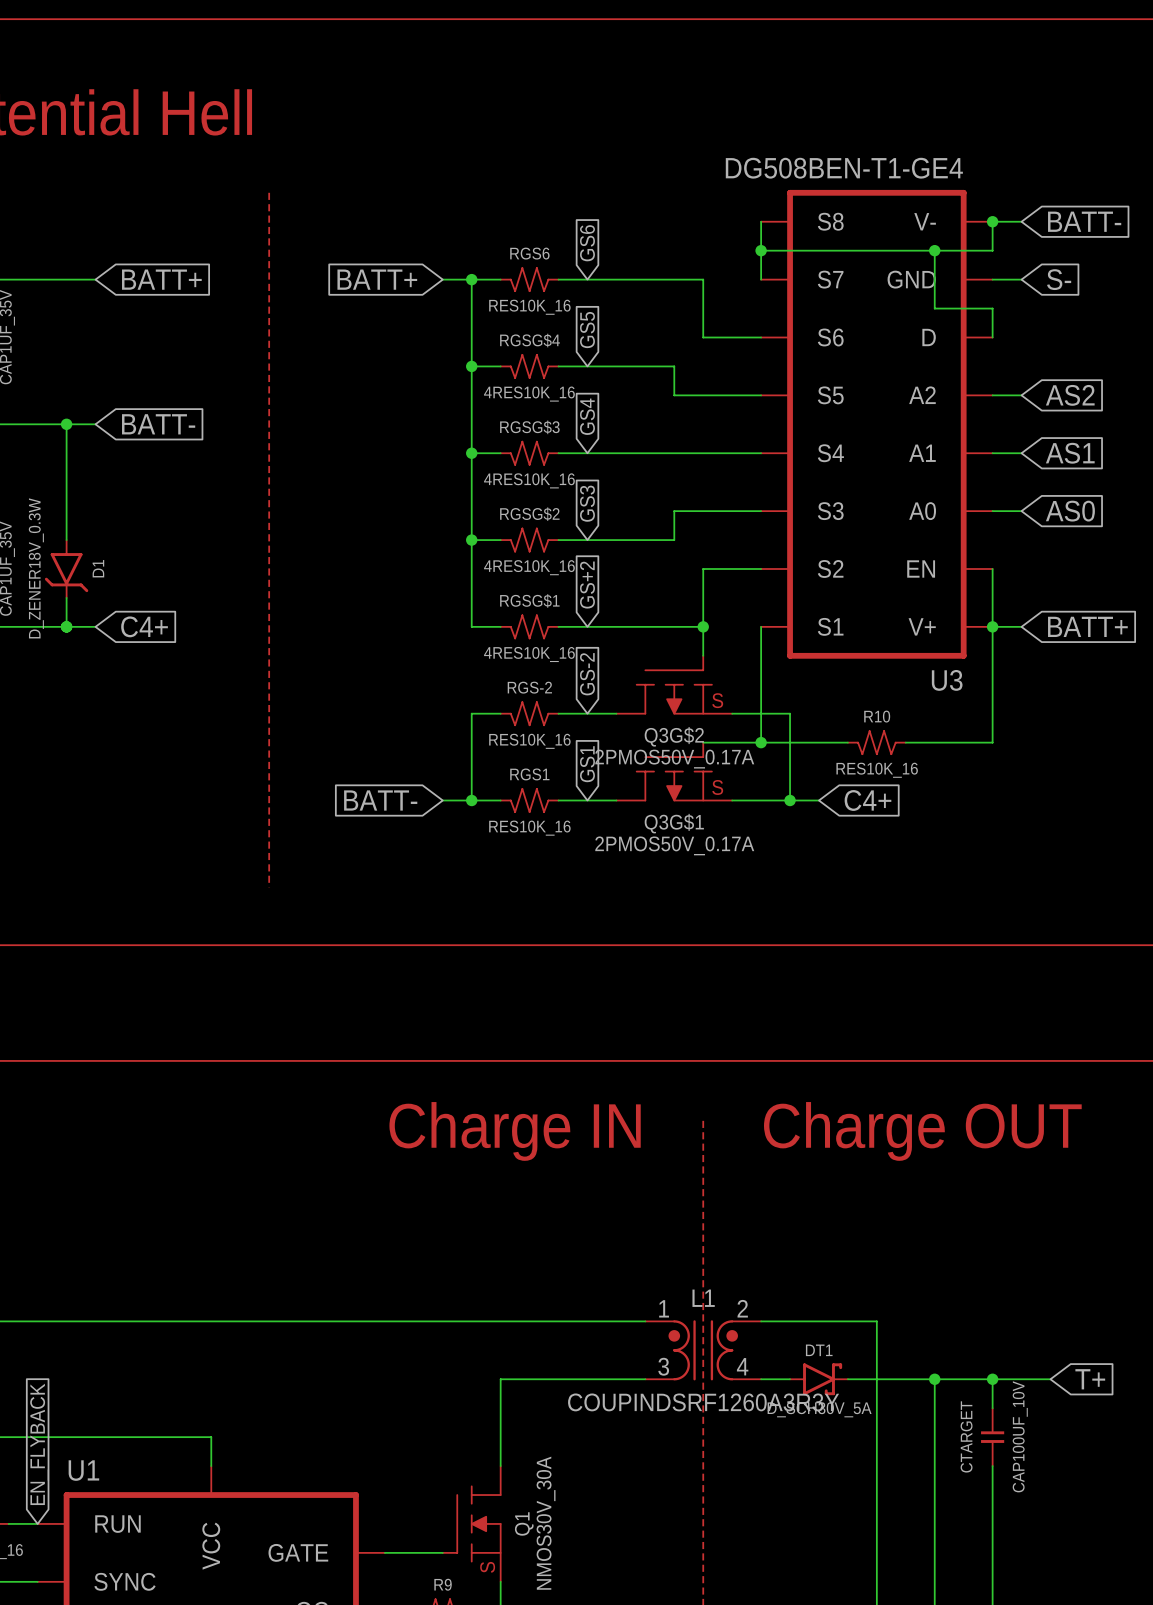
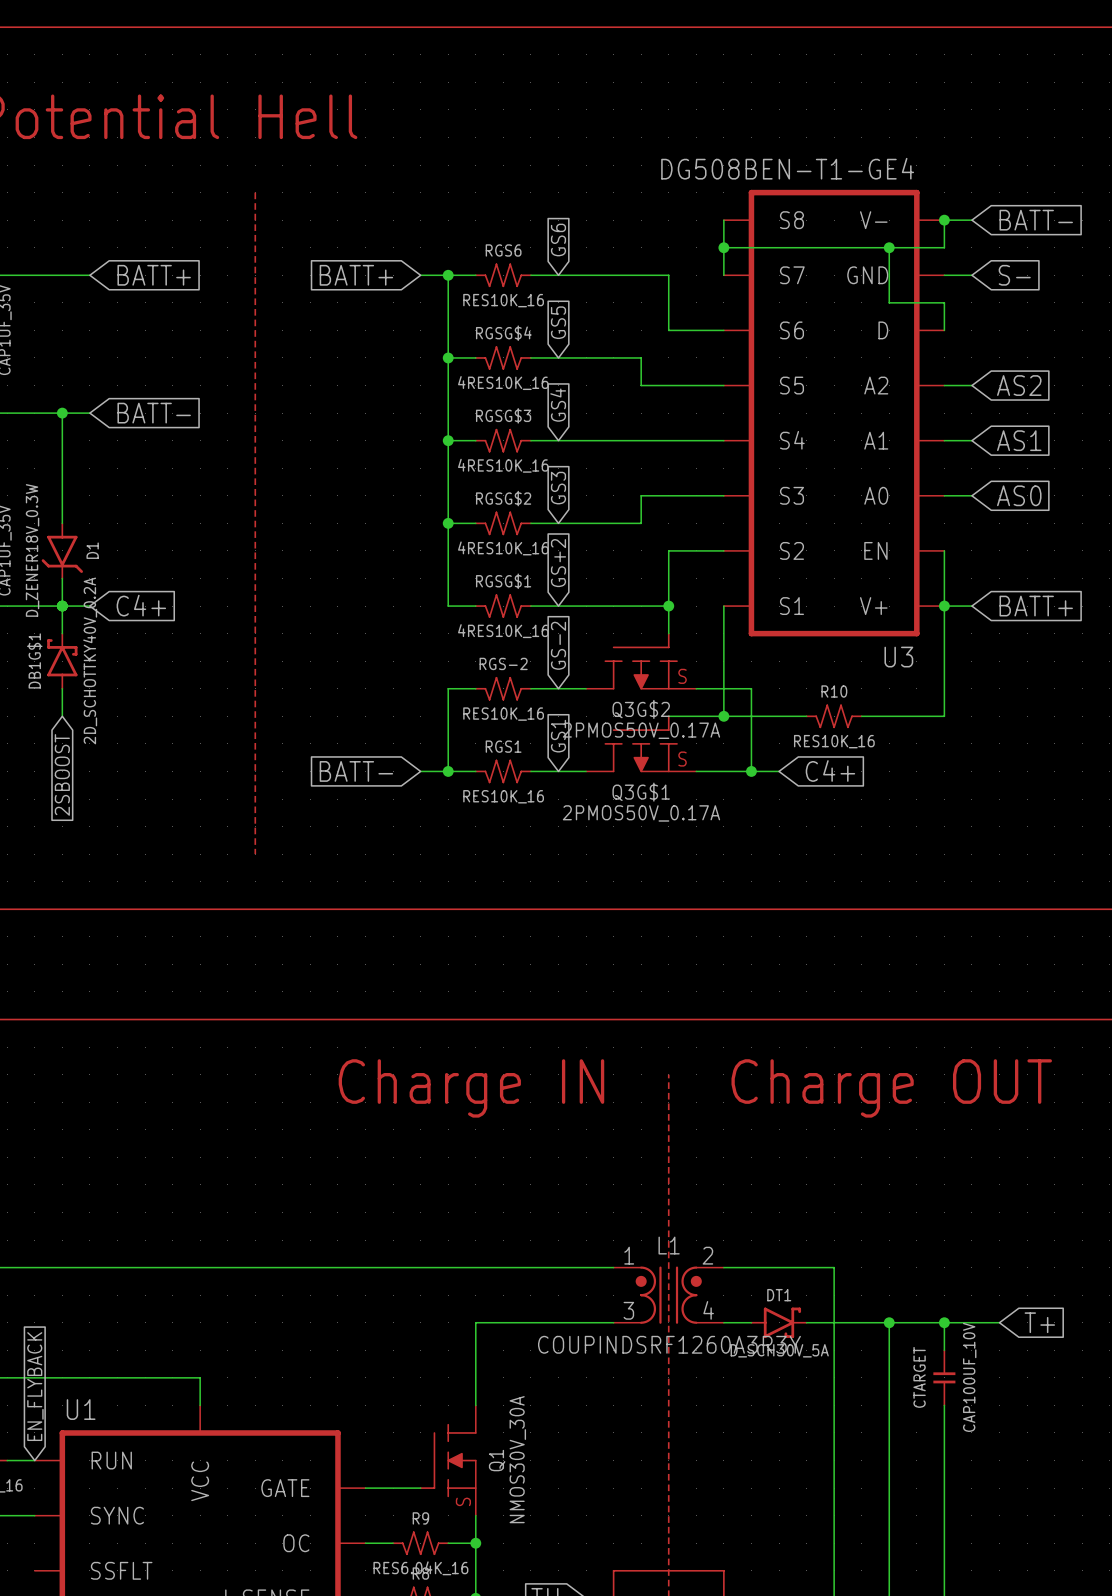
wire: none -> (62, 606) (62, 633)
DB1G$1: none -> 2D_SCHOTTKY40V_0.2A (62, 661)
wire: none -> (62, 688) (62, 716)
global label: none -> 2SBOOST (62, 774)

